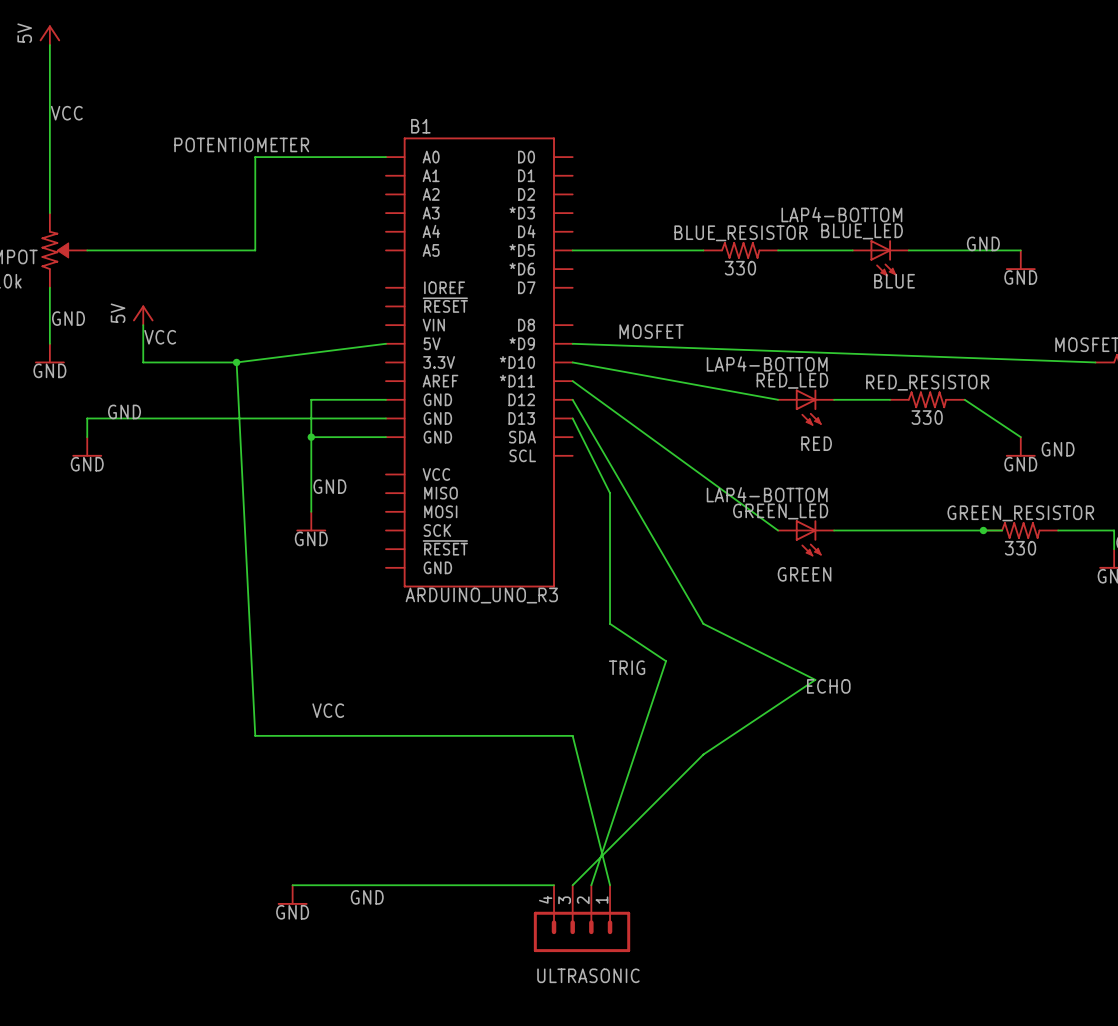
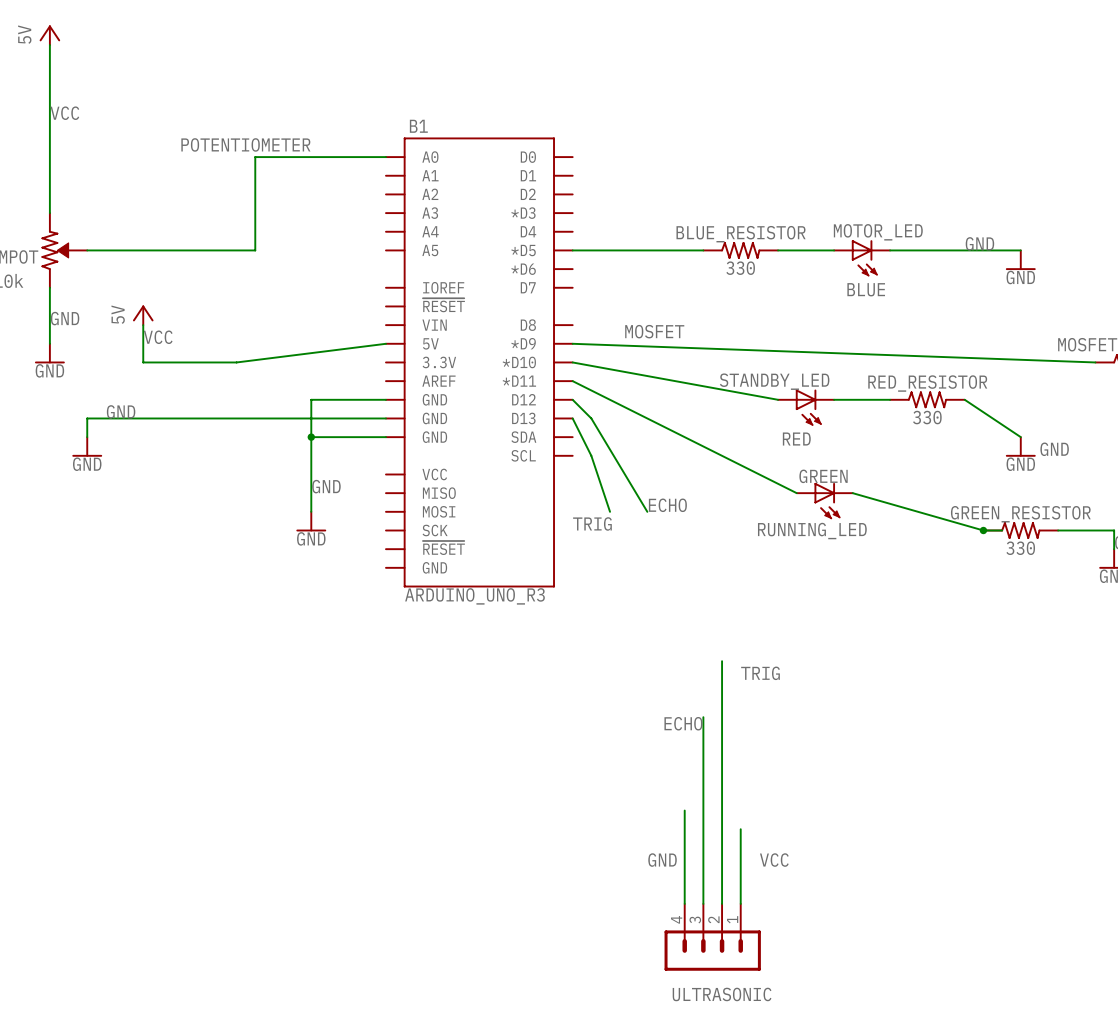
MOTOR_LED: none -> BLUE (862, 258)
BLUE_LED: LAP4-BOTTOM (880, 258) -> none
label: BLUE (894, 281) -> none
wire: (236, 362) (255, 735) (572, 735) (610, 885) -> none
junction: (236, 362) -> none
RED_LED value: LAP4-BOTTOM (767, 364) -> RED (796, 439)
RED_LED name: RED_LED (792, 380) -> STANDBY_LED (774, 381)
wire: (572, 381) (778, 530) -> (572, 381) (796, 493)
wire: (572, 399) (703, 623) (815, 679) (703, 754) (572, 885) -> (572, 399) (591, 418) (647, 511)
label: RED (816, 443) -> none
wire: (591, 455) (610, 493) (610, 623) (666, 661) (591, 885) -> (591, 455) (610, 511)
RUNNING_LED: none -> GREEN (824, 500)
label: none -> ECHO (667, 505)
label: none -> TRIG (592, 523)
wire: (834, 530) (983, 530) -> (852, 493) (983, 530)
GREEN_LED: LAP4-BOTTOM (806, 538) -> none
label: GREEN (804, 574) -> none
wire: none -> (722, 661) (722, 903)
label: TRIG (627, 667) -> none
label: none -> TRIG (760, 673)
label: ECHO (828, 686) -> none
label: VCC (328, 710) -> none
wire: none -> (703, 717) (703, 903)
label: none -> ECHO (683, 723)
wire: none -> (684, 810) (684, 903)
wire: none -> (740, 829) (740, 903)
label: none -> GND (662, 860)
label: none -> VCC (774, 860)
wire: (292, 885) (554, 885) -> none
power symbol: GND (292, 895) -> none
label: GND (367, 897) -> none
ULTRASONIC position: (582, 918) -> (712, 937)

